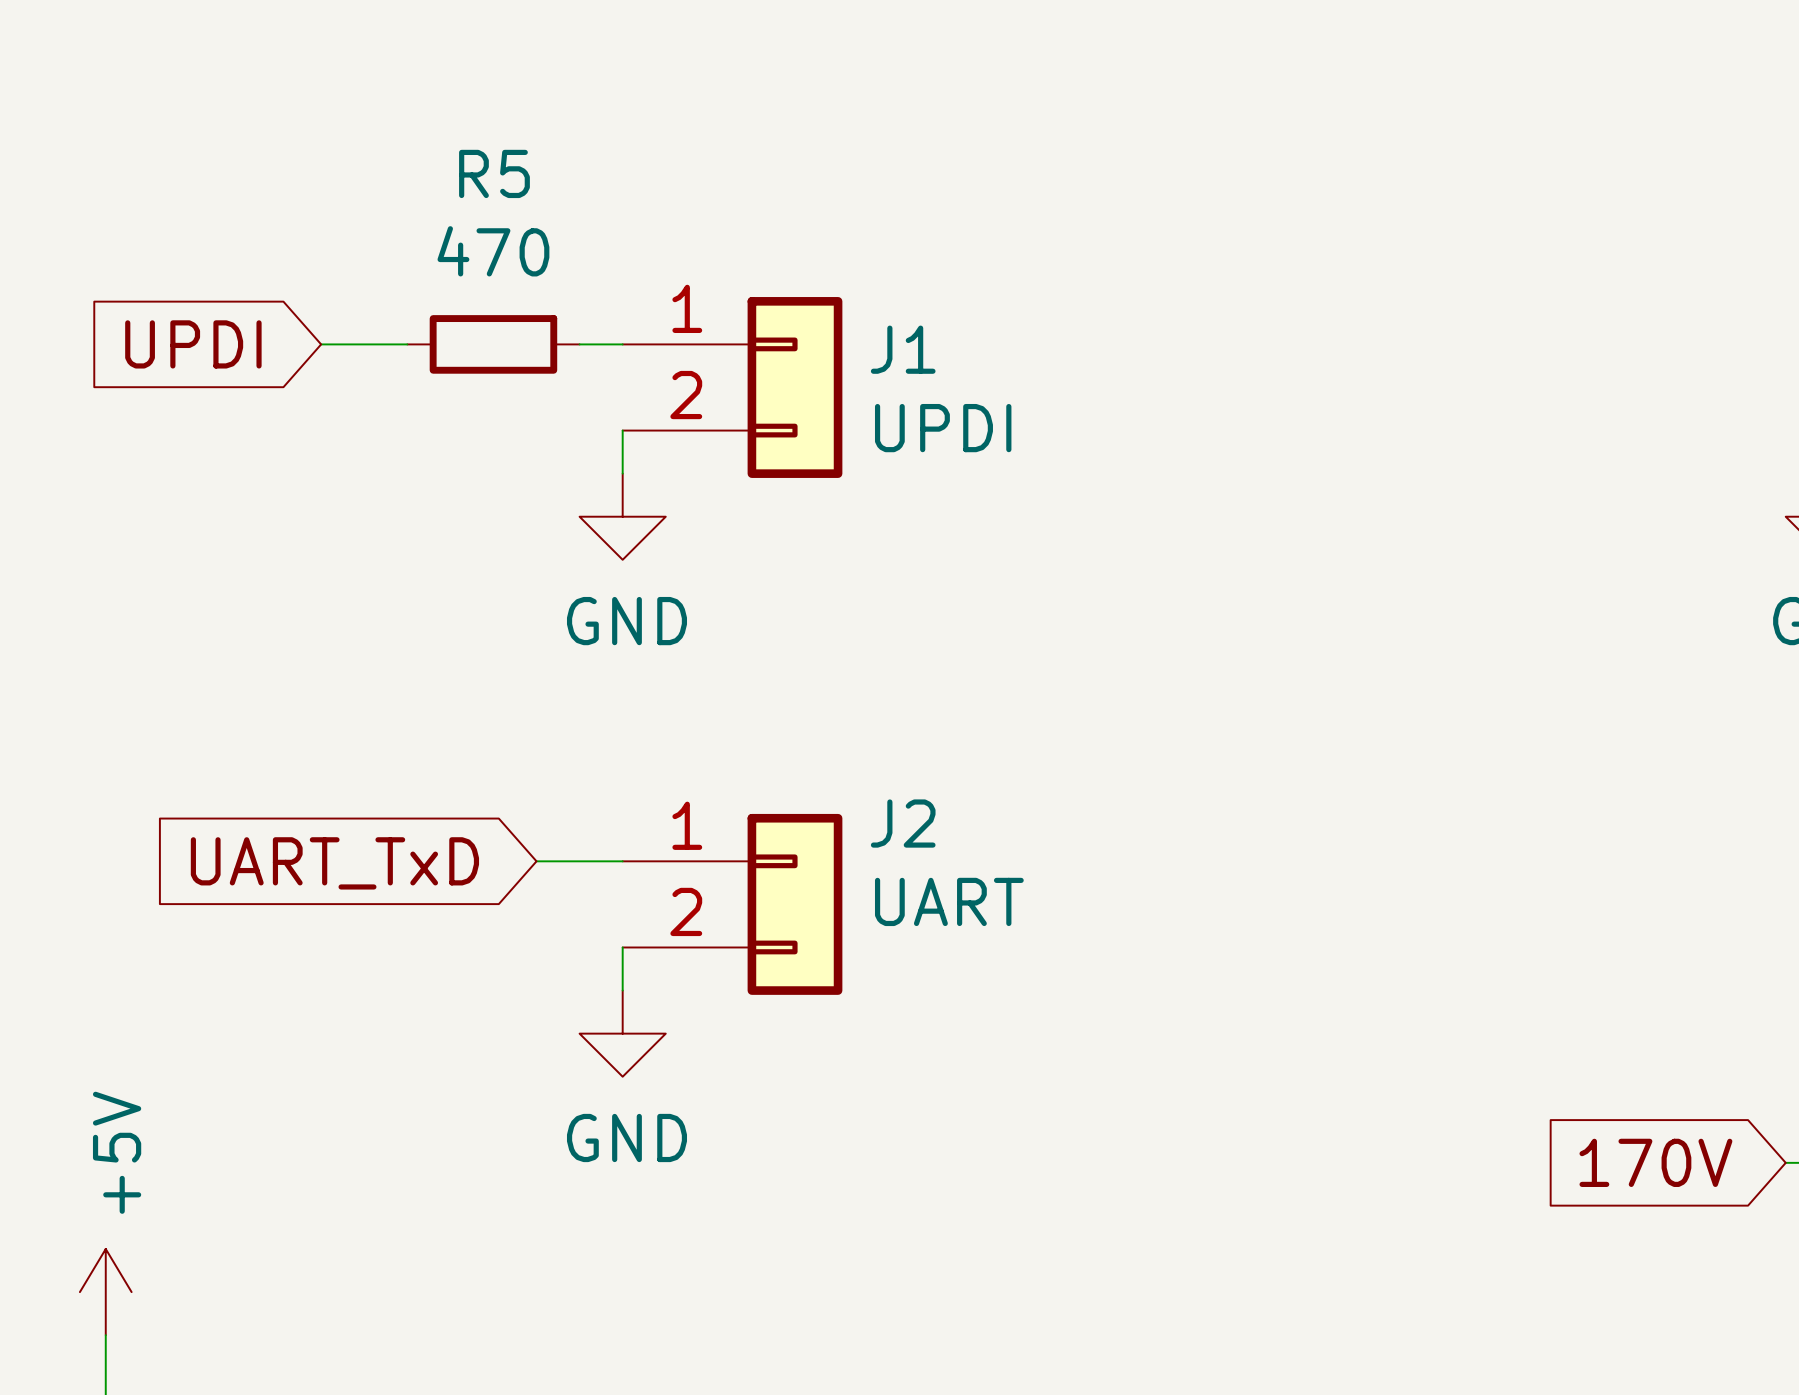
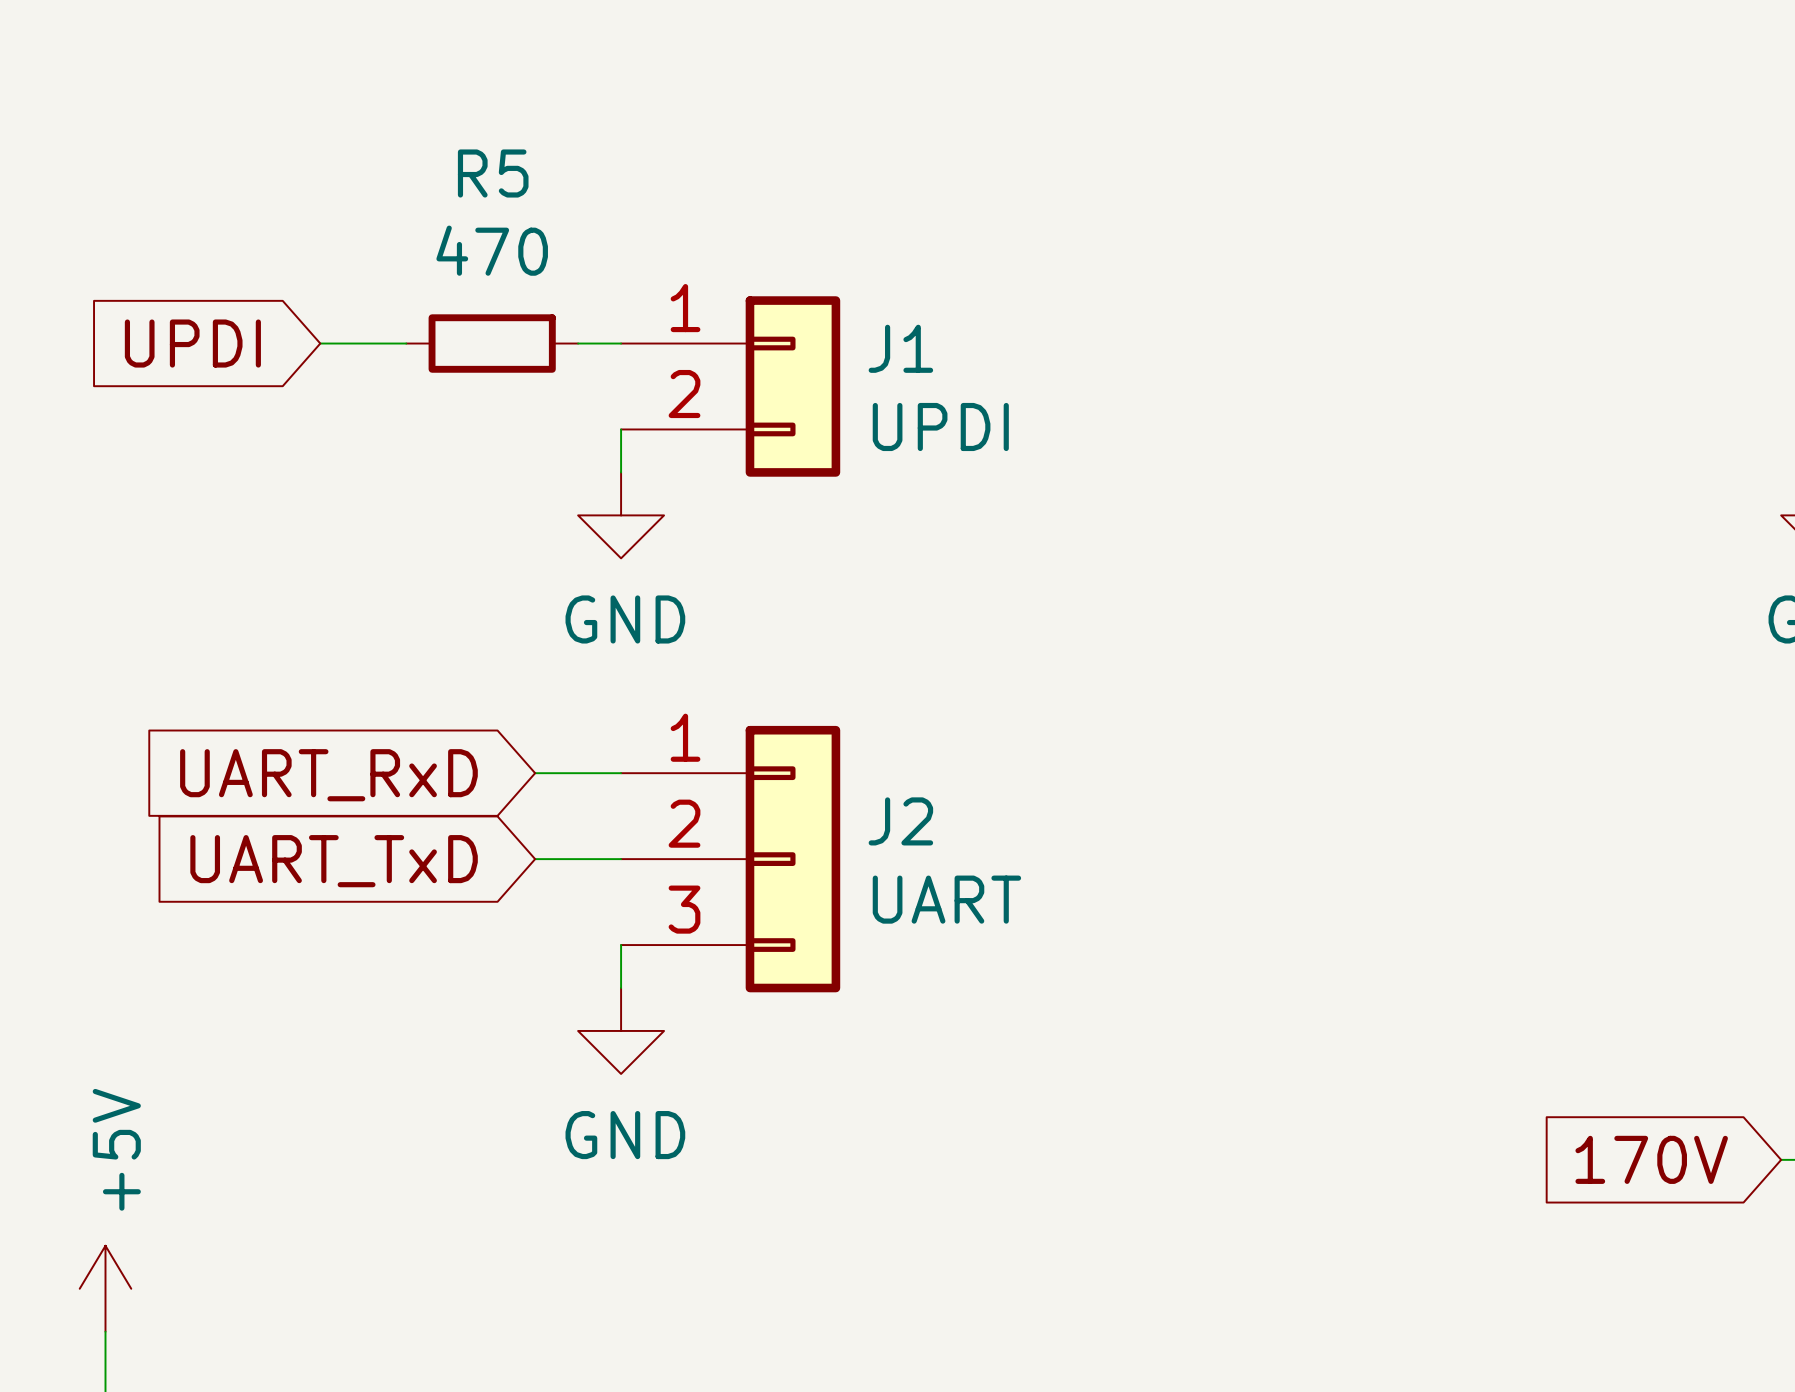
wire: none -> (535, 773) (621, 773)
global label: none -> UART_RxD (328, 775)
J2 symbol: [622, 813, 843, 995] -> [621, 725, 841, 993]

